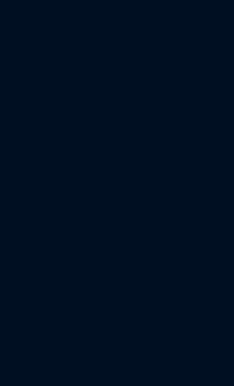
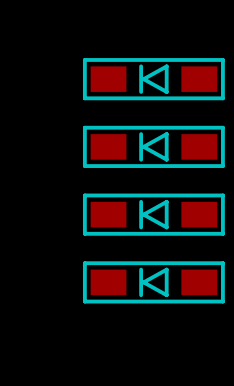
part: none -> (153, 79)
part: none -> (153, 146)
part: none -> (153, 214)
part: none -> (153, 282)

